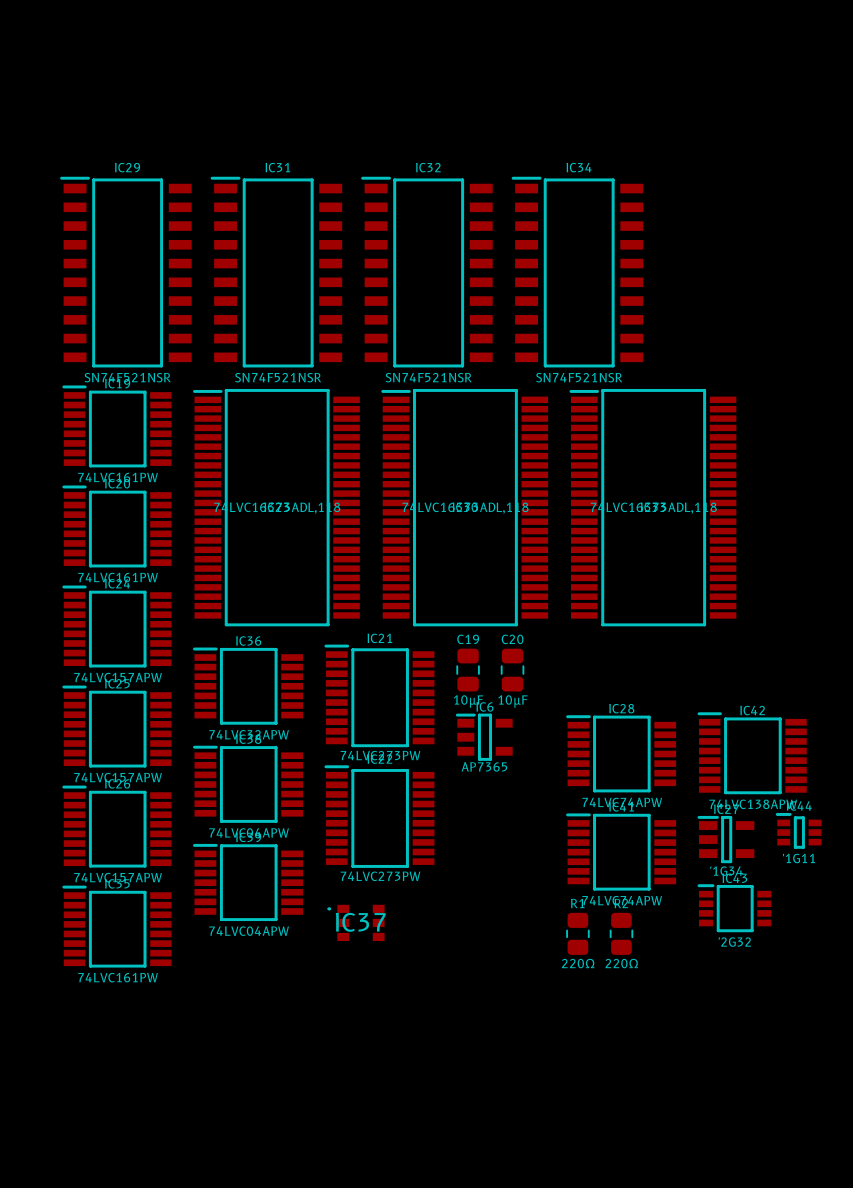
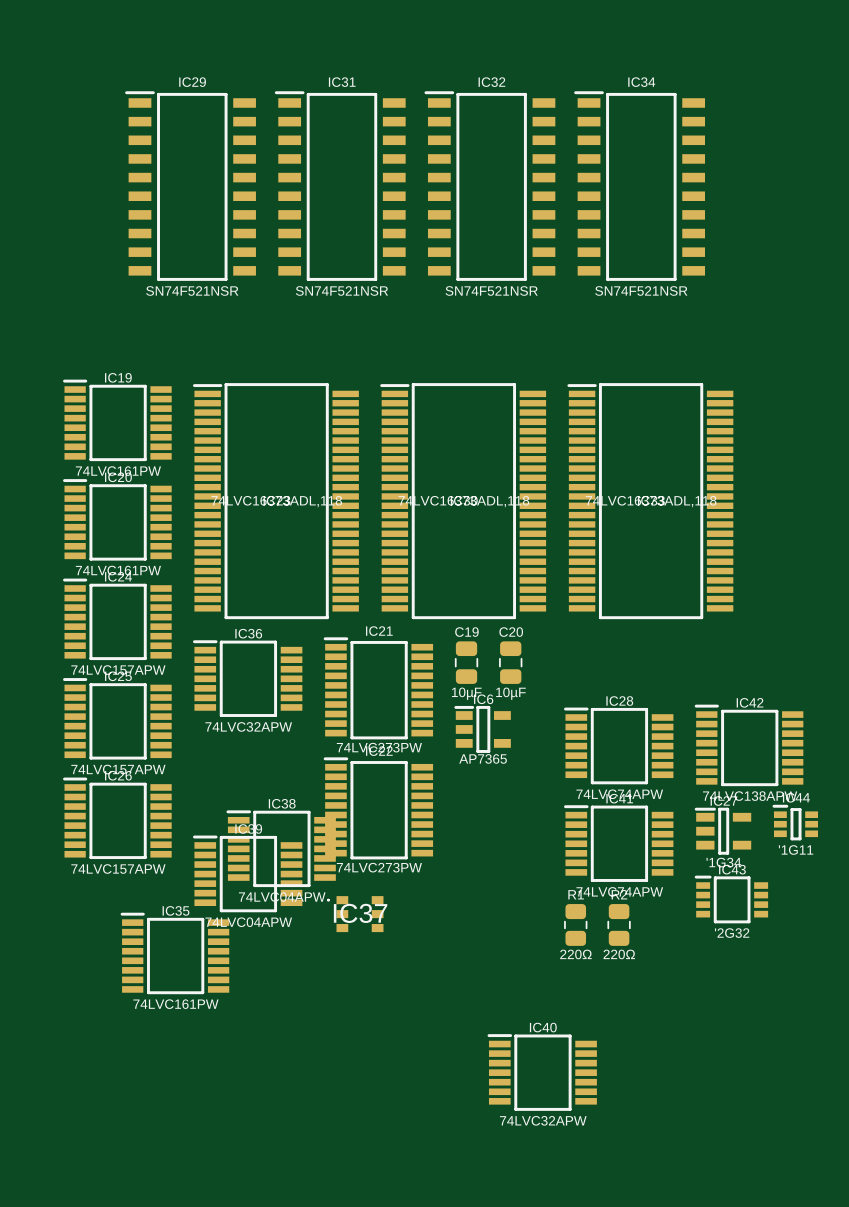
IC29 position: (125, 272) -> (190, 186)
IC31 position: (276, 272) -> (340, 186)
IC32 position: (426, 272) -> (489, 186)
IC34 position: (577, 272) -> (639, 186)
IC38 position: (248, 784) -> (281, 848)
IC35 position: (116, 926) -> (174, 953)
IC40: none -> (542, 1072)

